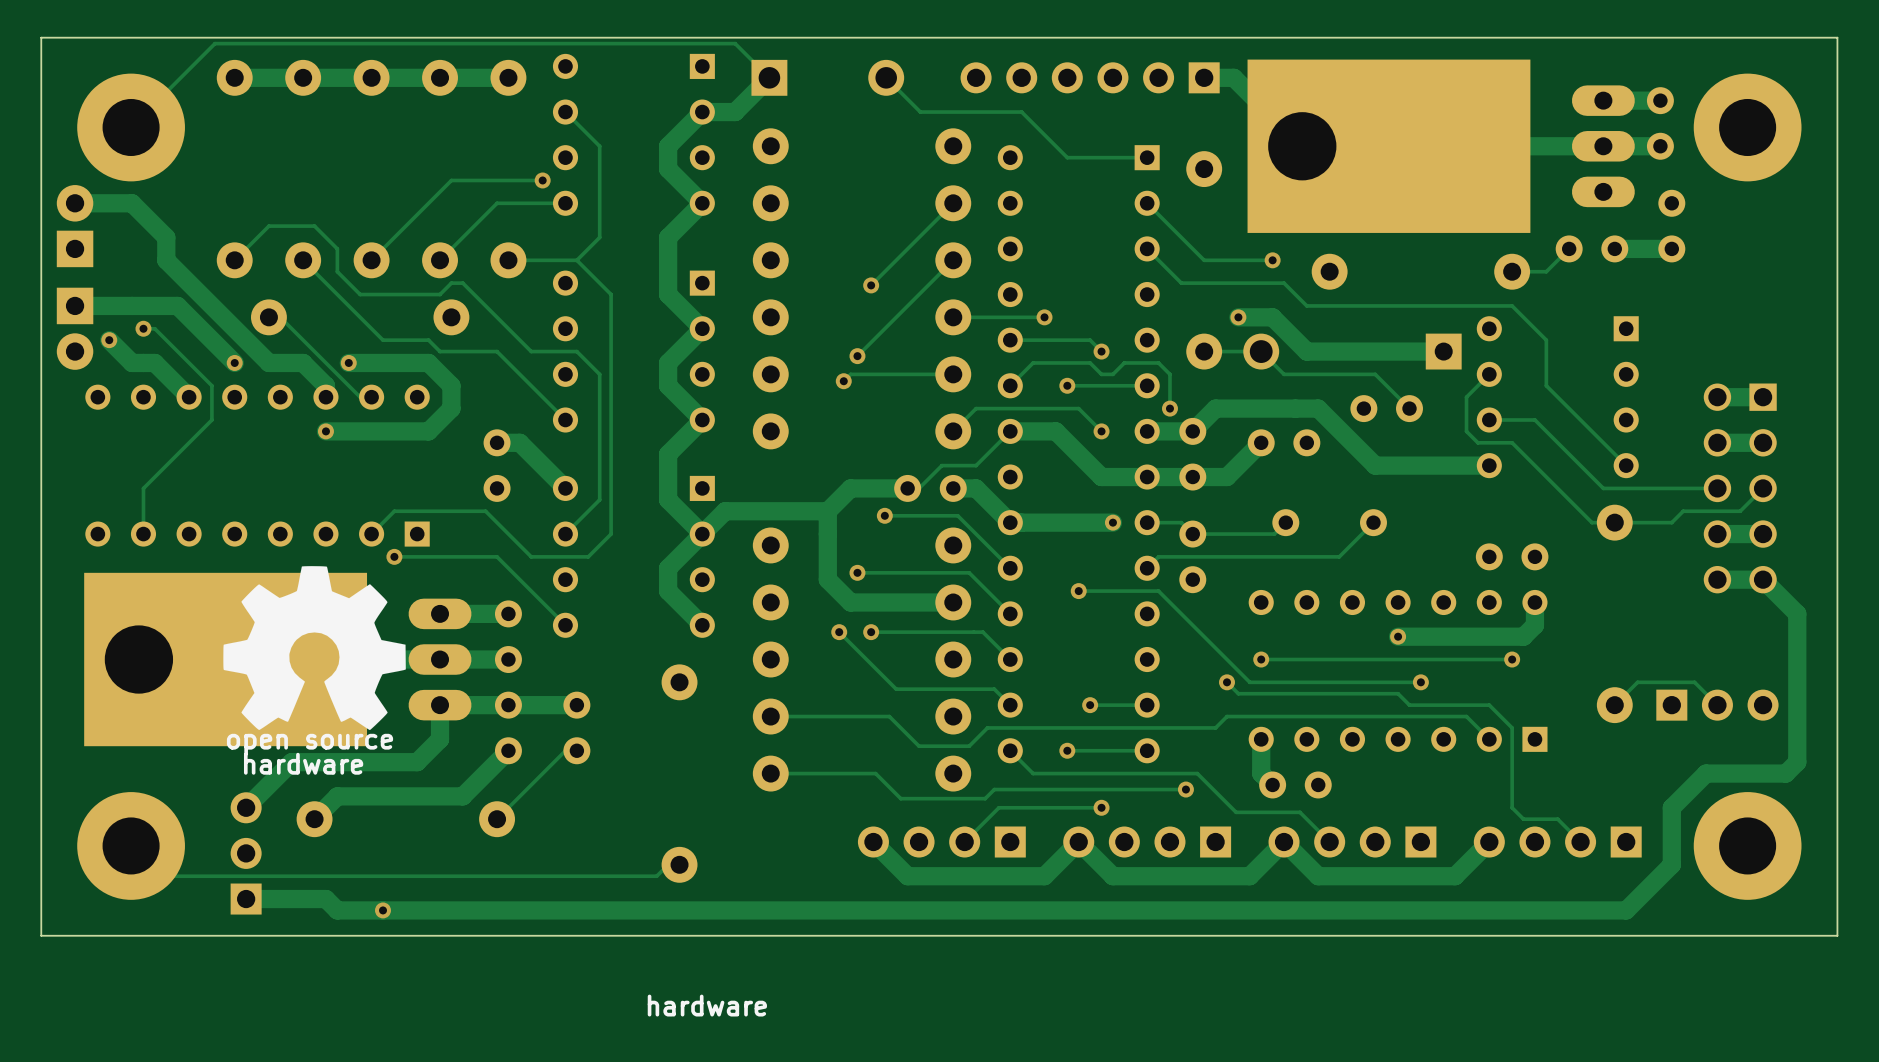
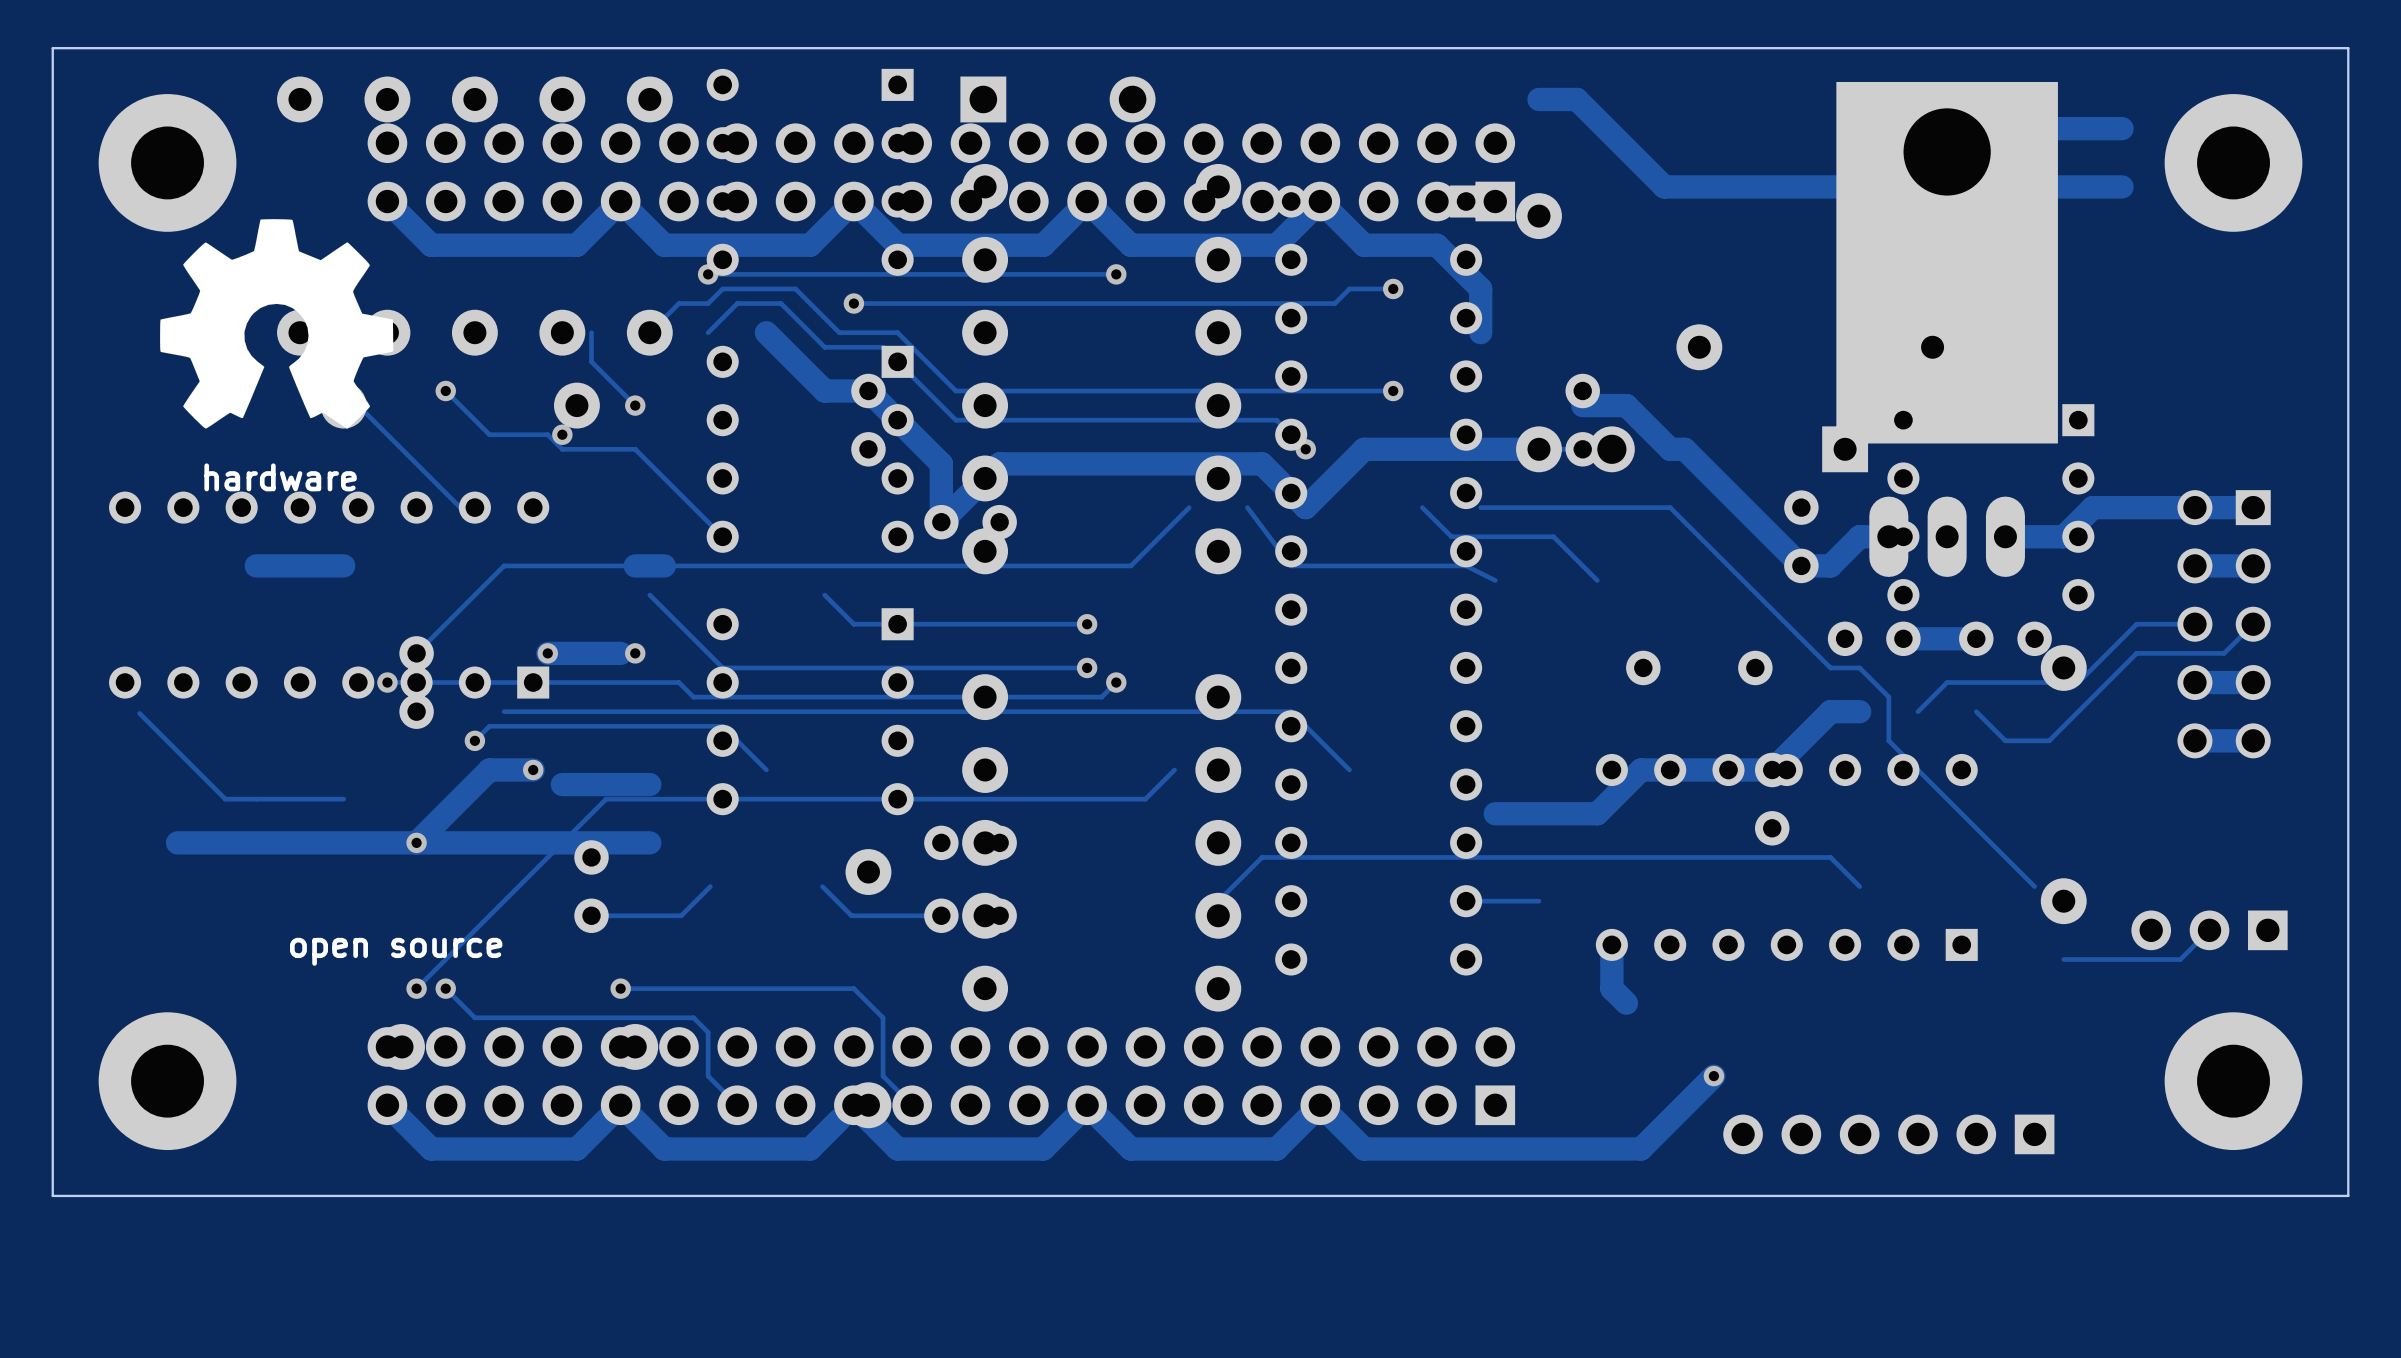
track: (508, 77) (234, 77) -> none
track: (886, 77) (920, 112) (1021, 112) (1067, 157) (1147, 157) -> none
part: (1090, 77) -> none
track: (565, 112) (599, 146) (599, 237) (576, 260) -> none
part: (1660, 123) -> none
track: (131, 127) (214, 43) (735, 43) (769, 77) (735, 112) (702, 112) (668, 146) (668, 169) (702, 203) (668, 237) (668, 294) (679, 305) -> (766, 332) (824, 391) (868, 391)
part: none -> (941, 172)
part rotation: 0° (1441, 146) -> 90° clockwise (1947, 329)
track: none -> (387, 201) (431, 245) (576, 245) (620, 201) (664, 245) (810, 245) (853, 201) (897, 245) (1043, 245) (1087, 201) (1130, 245) (1276, 245) (1320, 201) (1364, 245) (1436, 245) (1480, 288) (1480, 332)
track: (542, 180) (451, 180) (371, 260) -> none
via position: (542, 180) -> (708, 274)
track: (75, 203) (132, 203) (166, 237) (166, 260) (268, 362) (303, 362) (325, 385) (325, 397) -> none
track: (565, 203) (497, 203) (440, 260) -> none
track: (953, 203) (871, 285) -> none
track: (1147, 203) (1204, 260) (1272, 260) -> none
track: none -> (1116, 274) (708, 274)
part: (75, 226) -> none
track: none -> (1393, 288) (1349, 288) (1334, 303) (853, 303)
via: none -> (1393, 288)
part: (1671, 226) -> none
via: none -> (853, 303)
track: (1147, 248) (1181, 283) (1284, 283) (1306, 305) (1512, 305) (1546, 340) (1546, 385) (1626, 465) -> none
track: (1569, 248) (1546, 271) (1512, 271) -> none
part: (1591, 248) -> none
track: (1671, 248) (1614, 248) -> (1976, 638) (1903, 638)
track: (234, 260) (268, 226) (314, 226) (337, 248) (337, 271) (360, 294) (440, 294) (451, 283) (462, 283) -> (591, 332) (591, 361)
track: (303, 260) (348, 305) -> none
track: none -> (708, 332) (737, 303) (781, 303) (824, 347) (883, 347) (955, 420) (1276, 420) (1305, 449)
track: (576, 260) (508, 260) -> (1393, 391) (955, 391) (897, 332) (839, 332) (795, 288) (722, 288) (708, 303) (678, 303) (649, 332)
track: (576, 260) (611, 294) (611, 534) (588, 556) -> (1349, 770) (1291, 711) (751, 711)
track: (953, 260) (857, 356) -> none
via: (1272, 260) -> none
via position: (871, 285) -> (1116, 274)
track: (75, 305) (177, 305) (234, 362) -> none
via: none -> (445, 391)
via: none -> (1393, 391)
track: (497, 317) (531, 351) (576, 351) (599, 374) (599, 499) (565, 534) -> none
via: none -> (635, 405)
track: (1044, 317) (953, 317) -> none
via: (1044, 317) -> none
via: (1238, 317) -> none
part: (75, 328) -> none
track: (143, 328) (154, 328) (211, 385) (211, 420) (143, 488) (143, 534) -> none
via: (143, 328) -> none
part: none -> (868, 420)
track: (702, 328) (668, 362) (668, 385) (702, 420) (668, 454) (668, 499) (702, 534) -> (897, 420) (941, 463) (941, 522) (999, 463) (1262, 463) (1305, 507) (1364, 449) (1539, 449)
part: none -> (1582, 420)
track: (109, 340) (132, 362) (154, 362) (189, 397) -> none
via: (109, 340) -> none
via: none -> (562, 434)
track: (1010, 340) (1090, 340) (1101, 351) -> none
via: none -> (1305, 449)
via: (1101, 351) -> none
track: (1261, 351) (1284, 374) (1375, 374) (1409, 408) -> none
track: (1443, 351) (1318, 351) -> (1888, 536) (1859, 536) (1830, 565) (1801, 565) (1684, 449)
via: (857, 356) -> none
via: (234, 362) -> none
track: (348, 362) (428, 362) (451, 385) (451, 408) (428, 431) (325, 431) -> none
via: (348, 362) -> none
text: none -> hardware (280, 477)
track: (953, 374) (850, 374) (843, 381) -> none
track: (1489, 374) (1466, 397) (1466, 431) (1477, 442) (1512, 442) (1591, 522) (1671, 522) (1683, 511) -> (1976, 711) (2005, 740) (2049, 740) (2136, 653) (2151, 653)
via: (843, 381) -> none
track: (1010, 385) (1033, 362) (1090, 362) (1101, 374) (1112, 374) (1124, 362) (1158, 362) (1169, 374) (1169, 408) -> none
via: (1067, 385) -> none
track: (1147, 385) (1067, 385) -> none
track: none -> (1247, 507) (1291, 565) (1466, 565) (1495, 580)
track: none -> (1422, 507) (1451, 536) (1553, 536) (1597, 580)
track: none -> (2194, 507) (2092, 507) (2063, 536) (2005, 536)
part: none -> (970, 522)
via: (1169, 408) -> none
track: (1318, 408) (1215, 408) (1192, 431) (1147, 431) -> (1684, 522) (1670, 507) (1480, 507)
track width: thick (1318, 408) (1375, 465) -> thin (1684, 522) (1757, 595)
part rotation: 0° (1386, 408) -> 90° clockwise (1801, 536)
track: (1489, 420) (1534, 420) (1603, 488) (1671, 488) -> (1917, 711) (1947, 682) (2078, 682) (2136, 624)
via: (325, 431) -> none
track: (1101, 431) (1078, 408) (976, 408) (953, 431) -> none
via: (1101, 431) -> none
track: none -> (343, 565) (256, 565)
track: none -> (635, 565) (504, 565) (416, 653)
track: (519, 442) (565, 488) -> (664, 565) (1130, 565) (1189, 507)
track: (1261, 442) (1227, 477) (1101, 477) (1055, 431) (1010, 431) (976, 465) (941, 465) (919, 488) (850, 488) (827, 511) -> none
part: (1284, 442) -> none
part: (1192, 454) -> none
part: (497, 465) -> none
track: none -> (649, 595) (722, 667) (1087, 667)
track: none -> (824, 595) (853, 624) (1087, 624)
track: (1489, 465) (1375, 465) -> (2034, 886) (1888, 740) (1888, 697) (1859, 667) (1830, 667) (1757, 595)
via: none -> (1087, 624)
part: (930, 488) -> none
track: (953, 488) (976, 488) (1010, 522) (1112, 522) -> none
part: none -> (1874, 638)
part: none -> (2005, 638)
track: (428, 511) (394, 511) (371, 534) -> none
via: none -> (547, 653)
track: (485, 511) (531, 556) -> (635, 711) (678, 711)
track width: thin (485, 511) (428, 511) -> thick (620, 653) (547, 653)
via: none -> (635, 653)
track: (827, 511) (725, 511) (668, 568) (668, 591) (702, 625) -> none
track: (827, 511) (827, 579) (850, 602) (953, 602) -> none
track: (884, 515) (957, 515) (1010, 568) -> none
via: (884, 515) -> none
via: none -> (1087, 667)
via: (1112, 522) -> none
track: (1285, 522) (1274, 534) (1192, 534) (1181, 522) (1147, 522) -> none
track: (1373, 522) (1339, 556) (1158, 556) (1147, 568) -> none
via: none -> (387, 682)
part: none -> (416, 682)
track: none -> (1116, 682) (1101, 697) (693, 697) (678, 682) (387, 682)
via: none -> (1116, 682)
via: (394, 556) -> none
track: (497, 556) (565, 625) -> none
part: (1192, 556) -> none
track: none -> (1859, 711) (1830, 711) (1772, 770) (1641, 770) (1597, 813) (1495, 813)
part: (1512, 556) -> none
track: none -> (139, 713) (225, 799) (343, 799)
track: (857, 572) (969, 572) (1010, 613) -> none
via: (857, 572) -> none
track: none -> (474, 740) (489, 726) (722, 726) (766, 770)
via: none -> (474, 740)
track: (1763, 579) (1797, 613) (1797, 762) (1785, 773) (1706, 773) (1671, 807) (1671, 864) (1626, 910) (337, 910) (325, 899) (246, 899) -> none
track: (1078, 591) (1158, 591) (1249, 682) (1420, 682) -> none
via: (1078, 591) -> none
track: none -> (533, 770) (489, 770) (416, 842)
via: none -> (533, 770)
track: none -> (1174, 770) (1145, 799) (606, 799) (416, 988)
track: (1534, 602) (1534, 625) (1523, 636) (1398, 636) -> none
part: none -> (1772, 799)
track: (839, 632) (896, 689) (994, 689) (1010, 705) -> none
via: (839, 632) -> none
track: (871, 632) (982, 632) (1010, 659) -> none
via: (871, 632) -> none
part: (508, 636) -> none
via: (1398, 636) -> none
drawing position: (314, 648) -> (276, 323)
part: (277, 659) -> none
via: none -> (416, 842)
part: none -> (970, 842)
via: (1261, 659) -> none
track: (1512, 659) (1261, 659) -> none
via: (1512, 659) -> none
track: (1227, 682) (1238, 693) (1398, 693) (1409, 705) (1489, 705) (1512, 727) (1512, 807) (1523, 819) (1557, 819) (1580, 842) -> none
via: (1227, 682) -> none
via: (1420, 682) -> none
part: none -> (591, 886)
track: none -> (710, 886) (681, 915) (591, 915)
track: none -> (822, 886) (851, 915) (941, 915)
track: none -> (1859, 886) (1830, 857) (1262, 857) (1218, 901)
track: (576, 705) (440, 705) (440, 739) (417, 762) (291, 762) (246, 807) -> none
via: (1090, 705) -> none
track: (1135, 705) (1090, 705) -> none
track: none -> (1539, 901) (1466, 901)
track: (1717, 705) (1694, 682) (1637, 682) (1614, 705) -> none
part rotation: 0° (1717, 705) -> 180° (2209, 930)
part: none -> (970, 915)
track: (770, 716) (889, 716) (919, 746) (969, 746) (987, 727) (1215, 727) (1227, 716) (1466, 716) (1489, 739) -> none
part: (508, 727) -> none
part: (576, 727) -> none
track: none -> (2209, 930) (2180, 959) (2063, 959)
track: (508, 750) (462, 796) -> (737, 1105) (708, 1076) (708, 1032) (693, 1017) (591, 1017)
track: (576, 750) (565, 750) (497, 819) -> none
track: (1010, 750) (1033, 773) (1197, 773) (1236, 812) (1300, 812) (1329, 842) -> none
via: (1067, 750) -> none
track: (1147, 750) (1067, 750) -> none
text: hardware (303, 763) -> none
via: none -> (416, 988)
via: none -> (445, 988)
track: none -> (620, 988) (853, 988) (883, 1017) (883, 1076) (912, 1105)
via: none -> (620, 988)
track: (770, 773) (875, 773) (900, 798) (985, 798) (994, 789) (1185, 789) -> none
part: (1295, 784) -> none
via: (1185, 789) -> none
track: (371, 796) (337, 796) (314, 819) -> (474, 1017) (445, 988)
track width: thick (462, 796) (371, 796) -> thin (591, 1017) (474, 1017)
track: (1101, 807) (998, 807) (964, 842) -> none
via: (1101, 807) -> none
part: none -> (941, 1076)
part: (941, 842) -> none
part: (1147, 842) -> none
track: none -> (1713, 1076) (1641, 1148) (1364, 1148) (1320, 1105) (1276, 1148) (1130, 1148) (1087, 1105) (1043, 1148) (897, 1148) (853, 1105)
via: none -> (1713, 1076)
part: (1352, 842) -> none
track: (1489, 842) (1455, 876) (1318, 876) (1284, 842) (1249, 876) (1112, 876) (1078, 842) (1044, 876) (907, 876) (873, 842) -> none
part: (1557, 842) -> none
part: (246, 853) -> none
track: (656, 876) (161, 876) -> (839, 1119) (810, 1148) (664, 1148) (620, 1105) (576, 1148) (431, 1148) (387, 1105)
part: none -> (1888, 1134)
via: (382, 910) -> none
text: hardware (707, 1005) -> none

